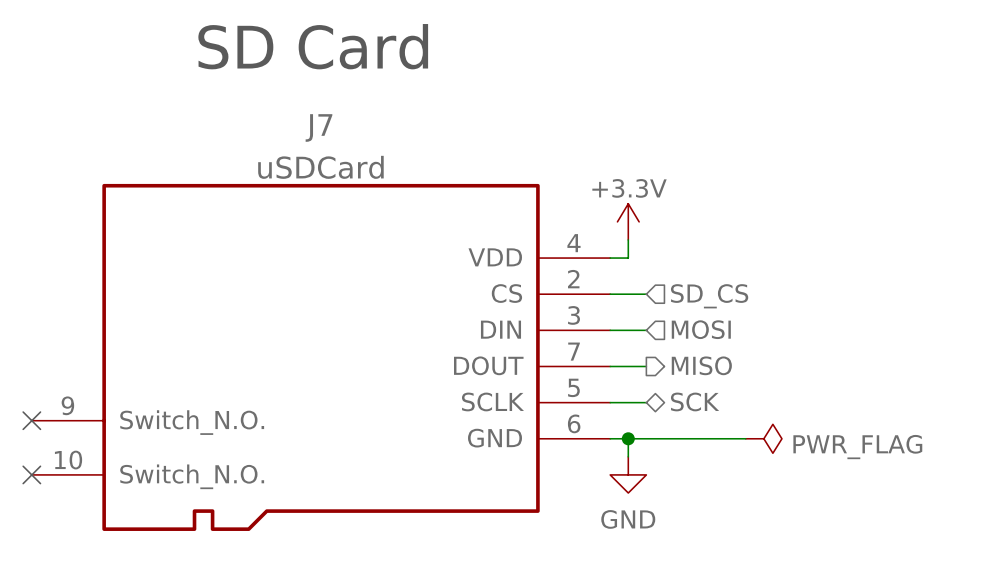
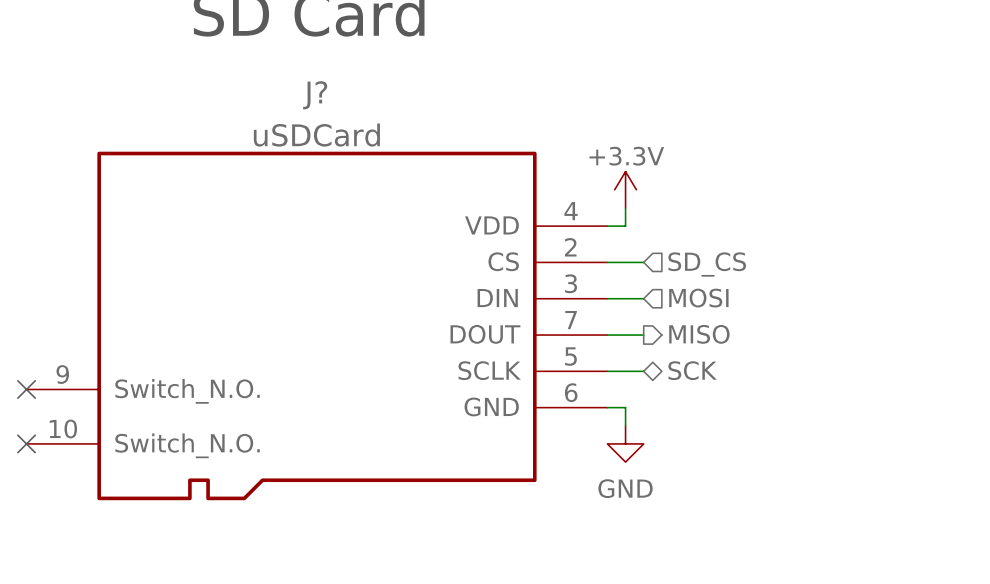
J7 name: J7 (318, 127) -> J? (315, 95)
wire: (628, 438) (745, 438) -> none
junction: (628, 438) -> none
power symbol: PWR_FLAG (763, 438) -> none

